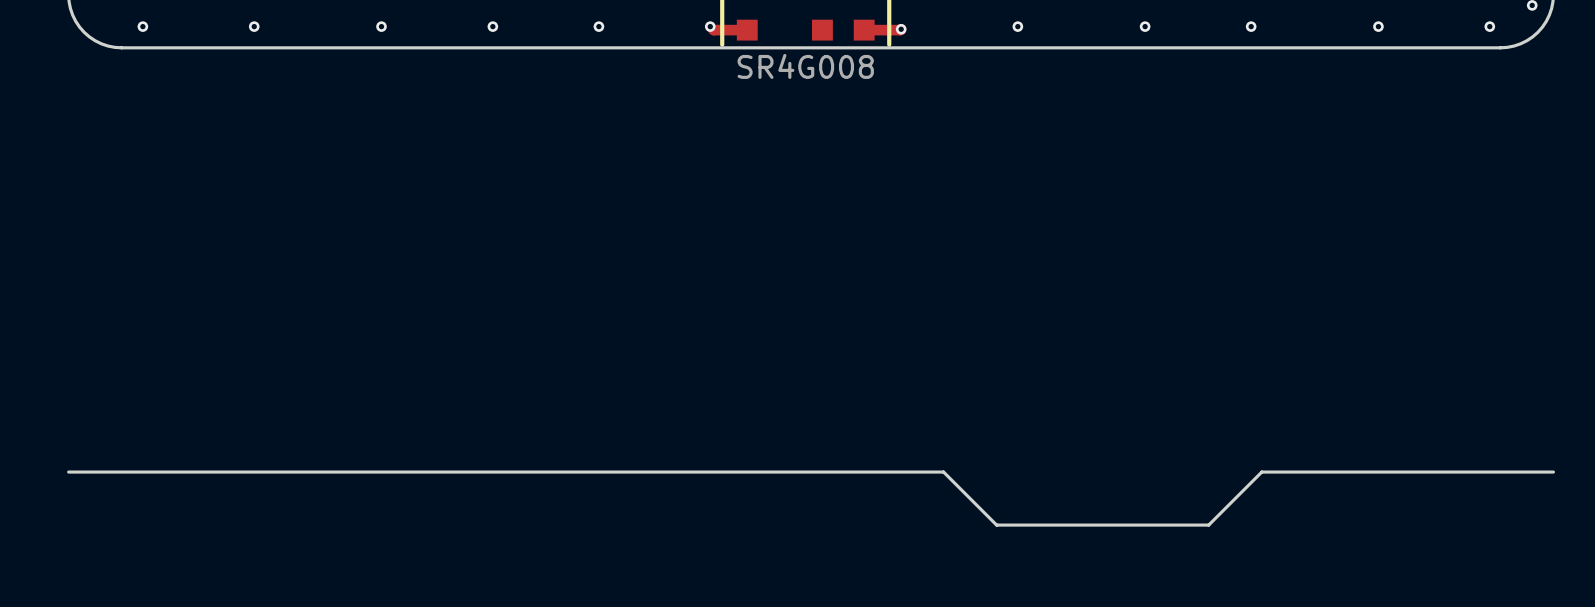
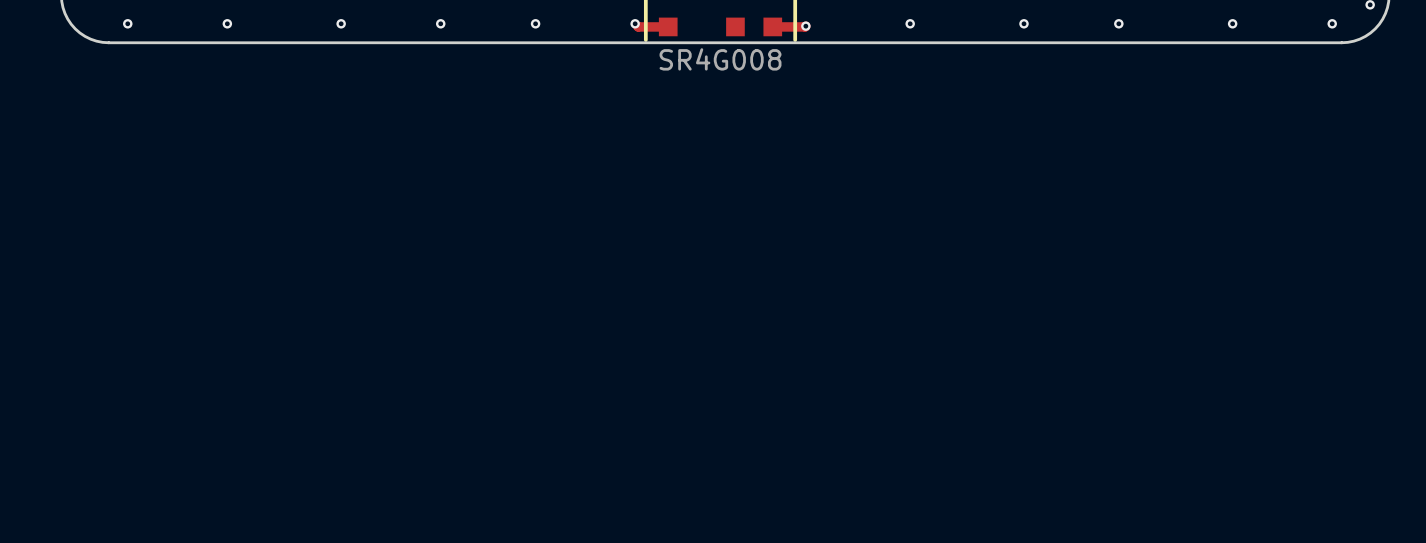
board edge: (68, 472) (943, 472) (996, 525) (1208, 525) (1261, 472) (1553, 472) -> none

